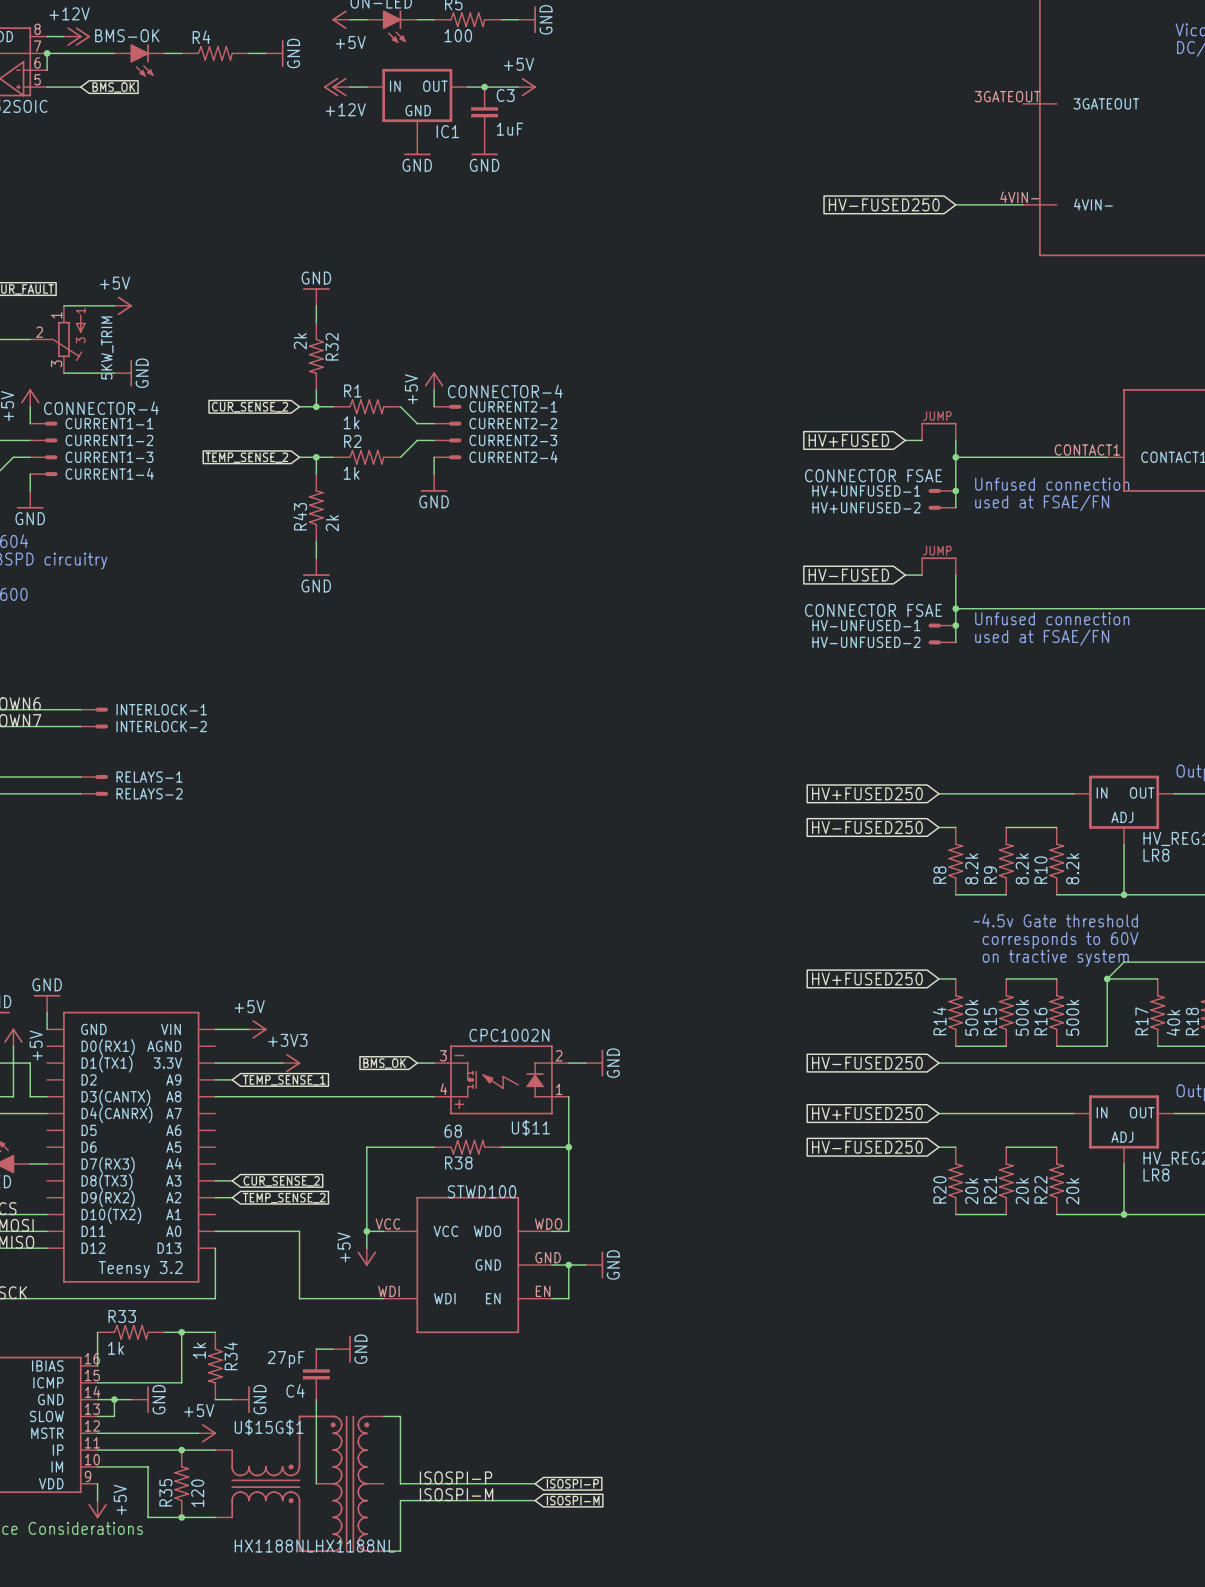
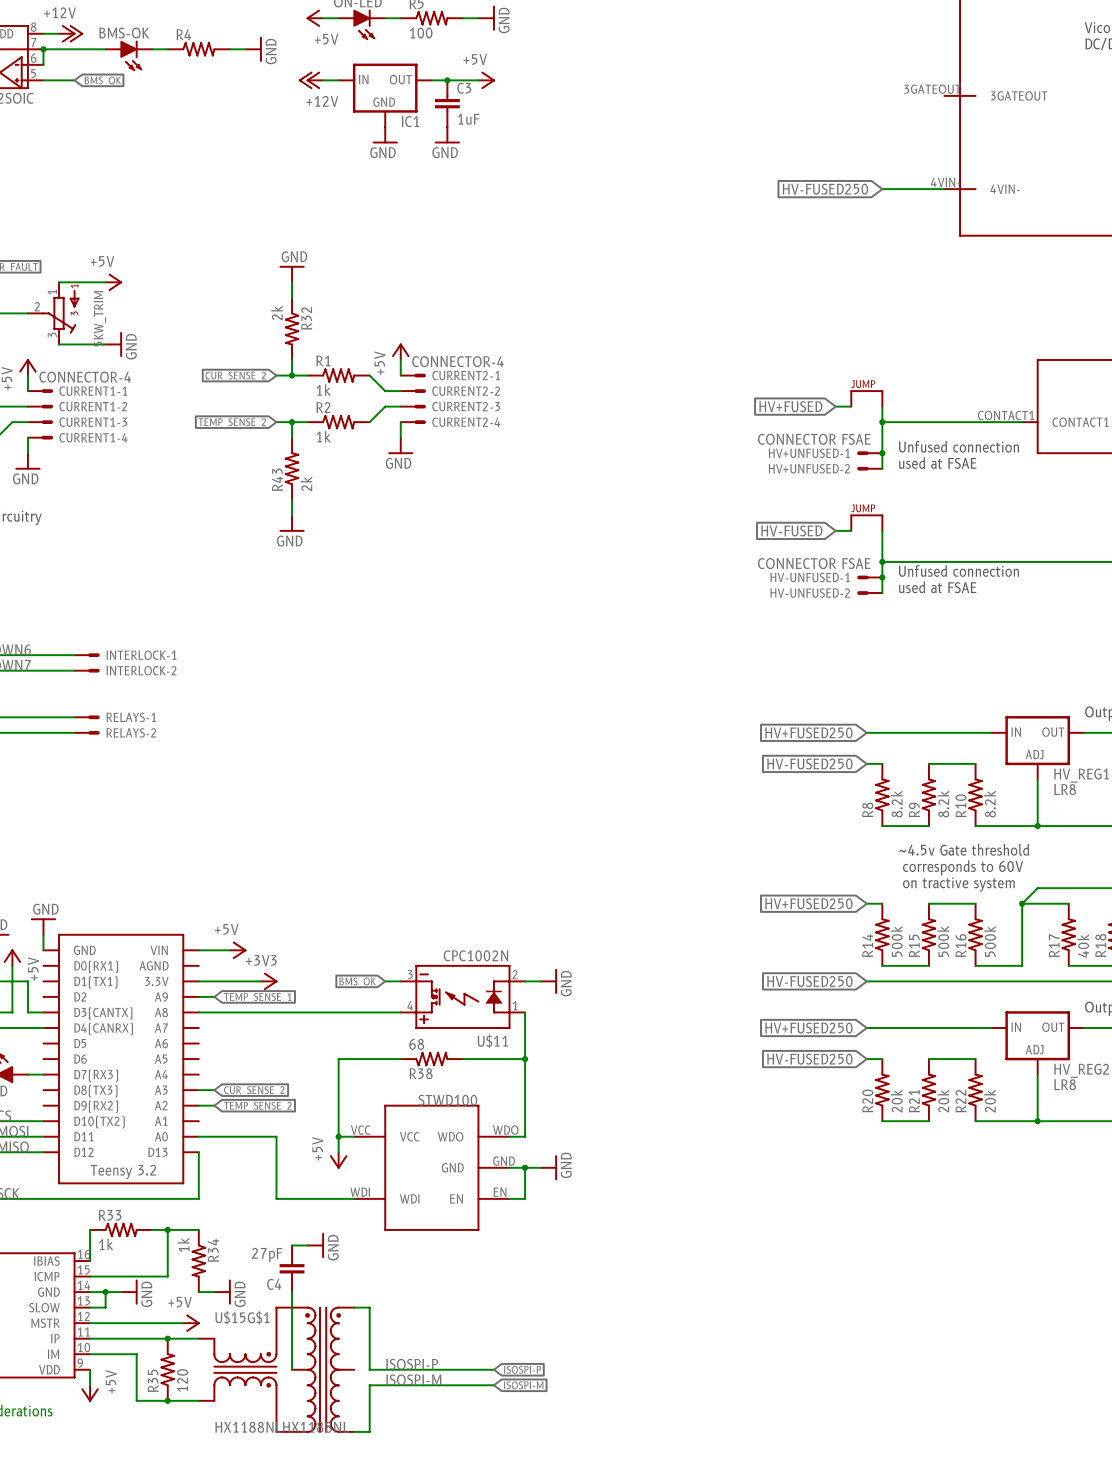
text: used at FSAE/FN (1042, 502) -> used at FSAE (937, 463)
text: used at FSAE/FN (1042, 637) -> used at FSAE (937, 587)

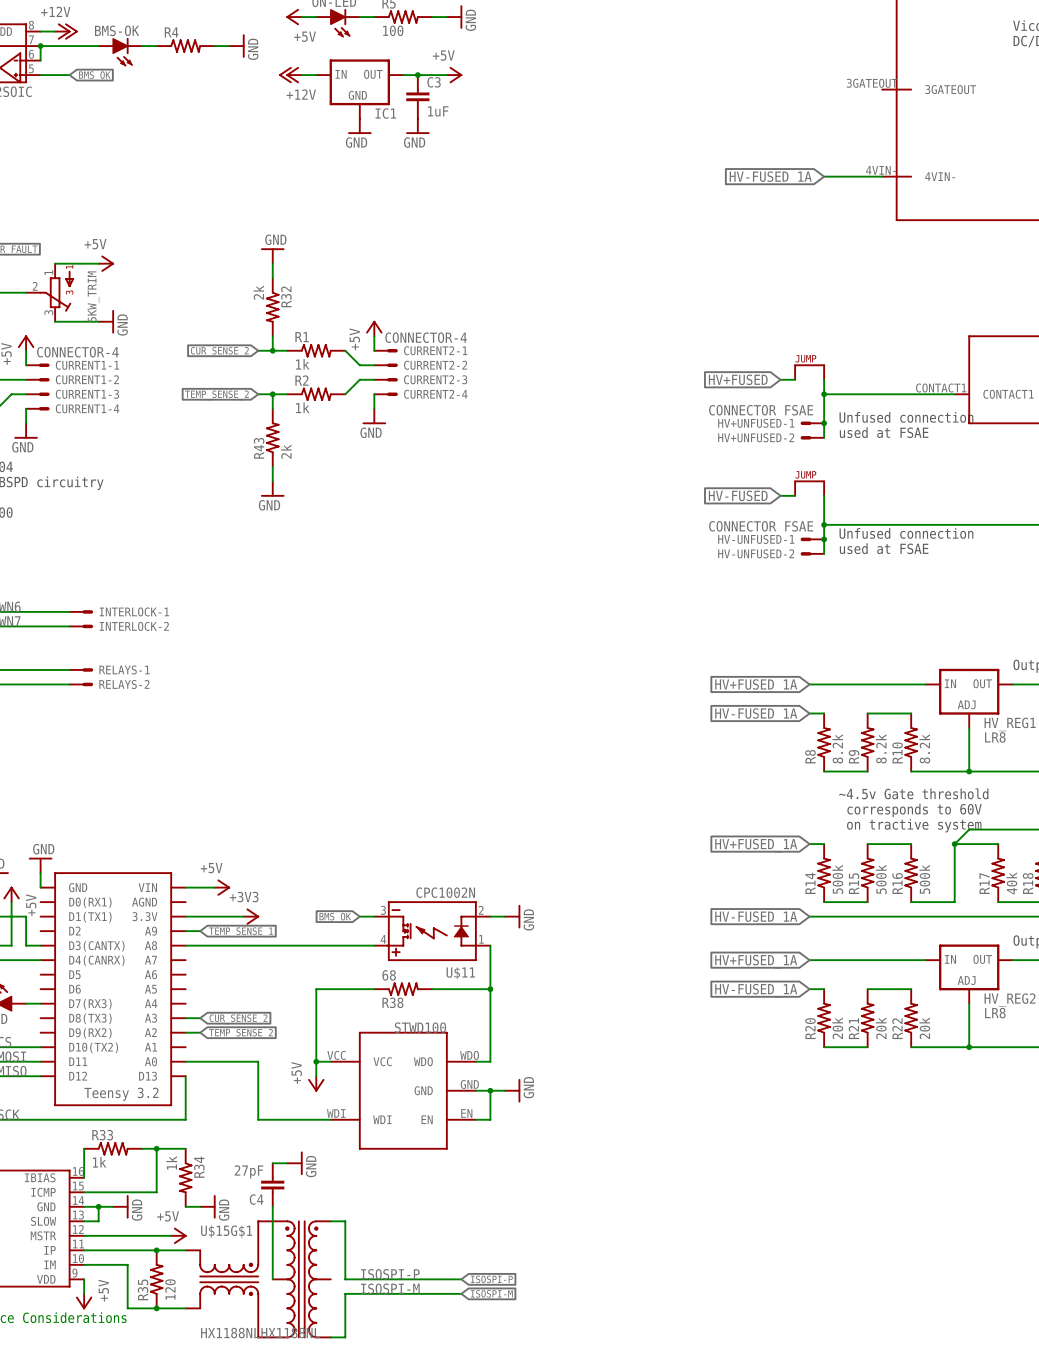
global label: HV-FUSED250 (825, 189) -> HV-FUSED_1A (770, 178)
global label: HV+FUSED250 (808, 732) -> HV+FUSED_1A (756, 686)
global label: HV-FUSED250 (809, 763) -> HV-FUSED_1A (756, 715)
global label: HV+FUSED250 (808, 903) -> HV+FUSED_1A (756, 845)
global label: HV-FUSED250 (809, 981) -> HV-FUSED_1A (756, 918)
global label: HV+FUSED250 (808, 1028) -> HV+FUSED_1A (756, 961)
global label: HV-FUSED250 (809, 1059) -> HV-FUSED_1A (756, 990)

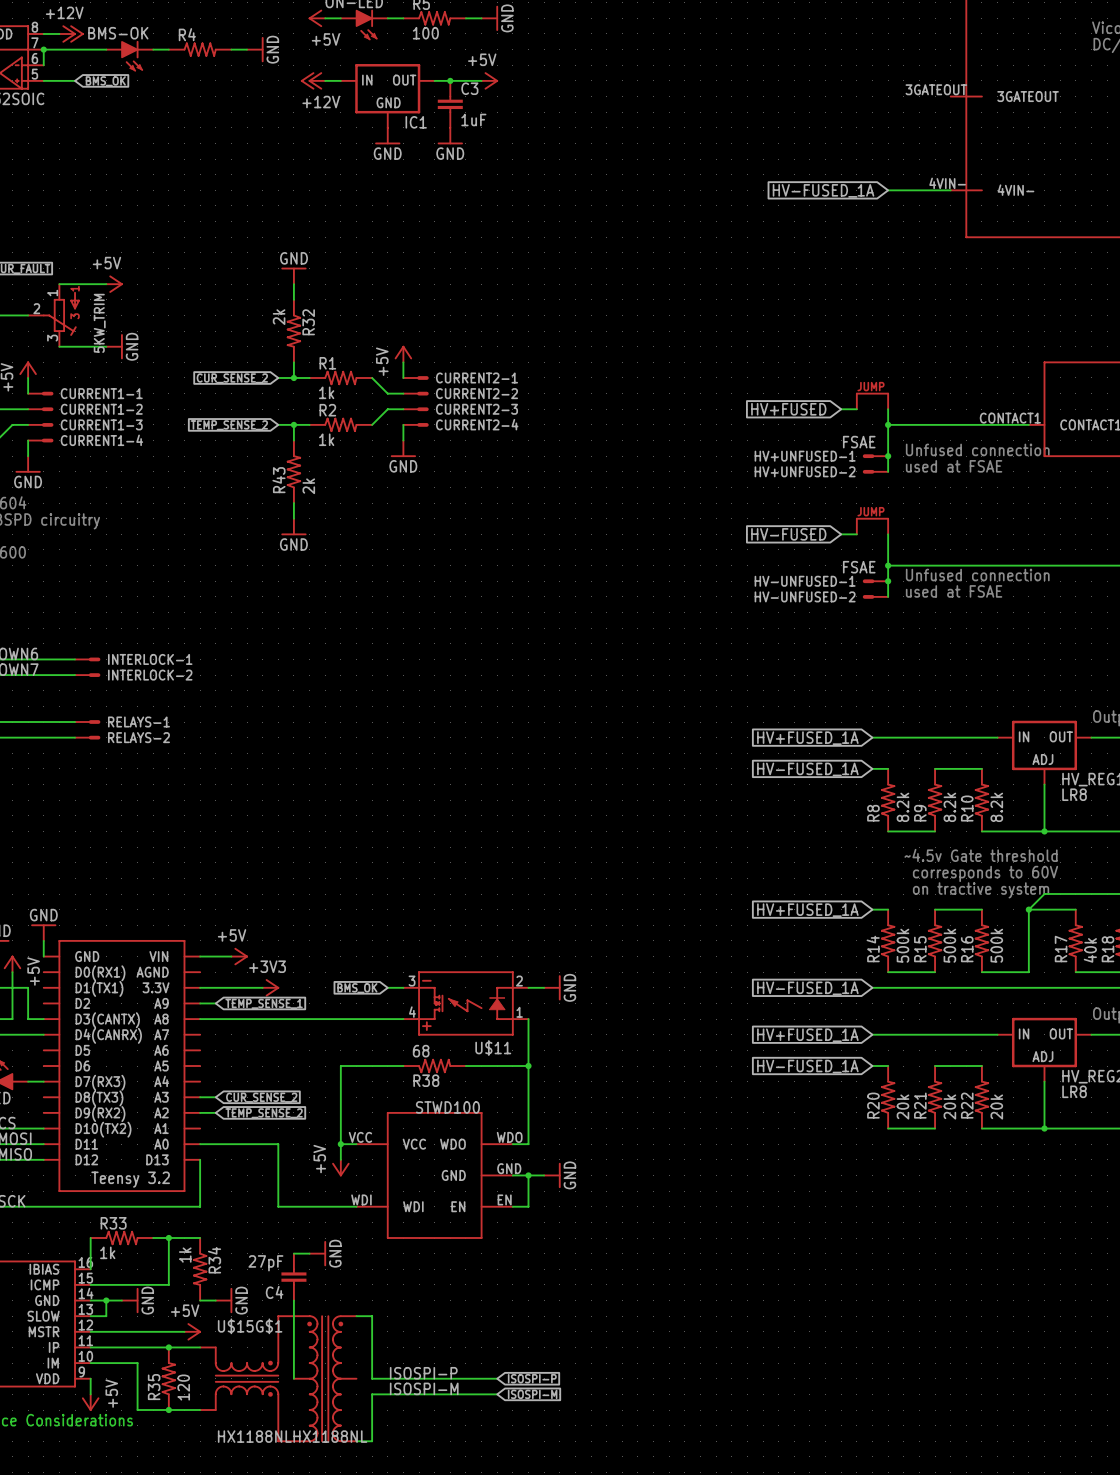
CURRENT2-1 value: CONNECTOR-4 (426, 337) -> none
CURRENT1-1 value: CONNECTOR-4 (77, 352) -> none
HV+UNFUSED-1 value: CONNECTOR FSAE (761, 410) -> FSAE (859, 442)
HV-UNFUSED-1 value: CONNECTOR FSAE (761, 526) -> FSAE (859, 567)
U$11 value: CPC1002N (445, 892) -> none

